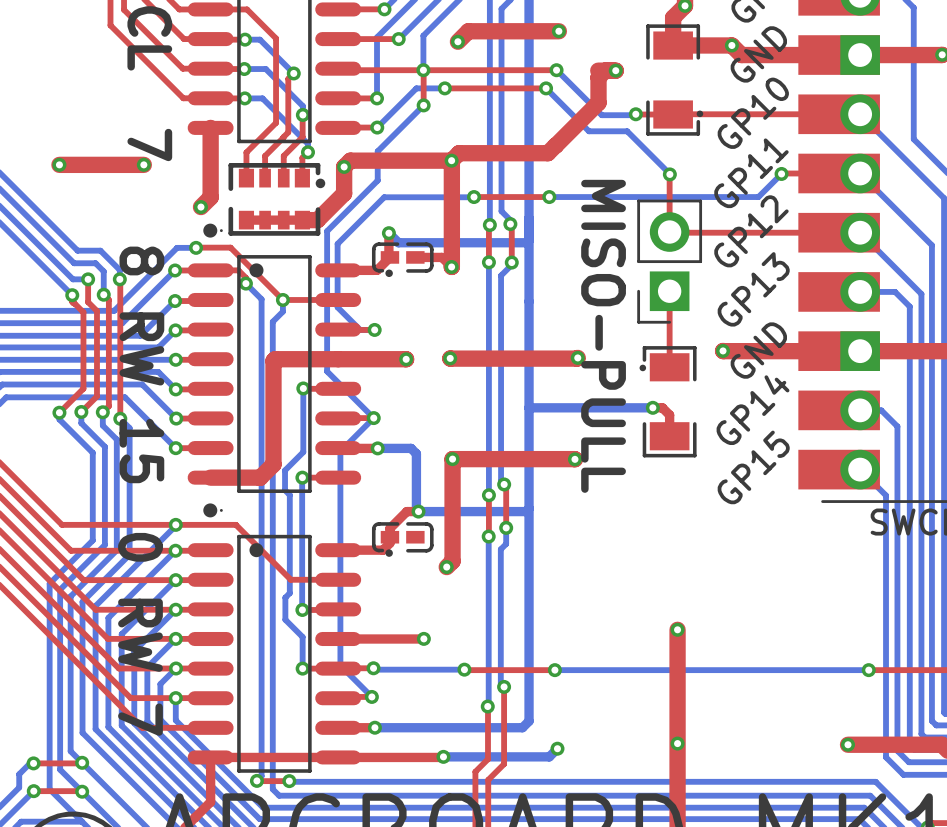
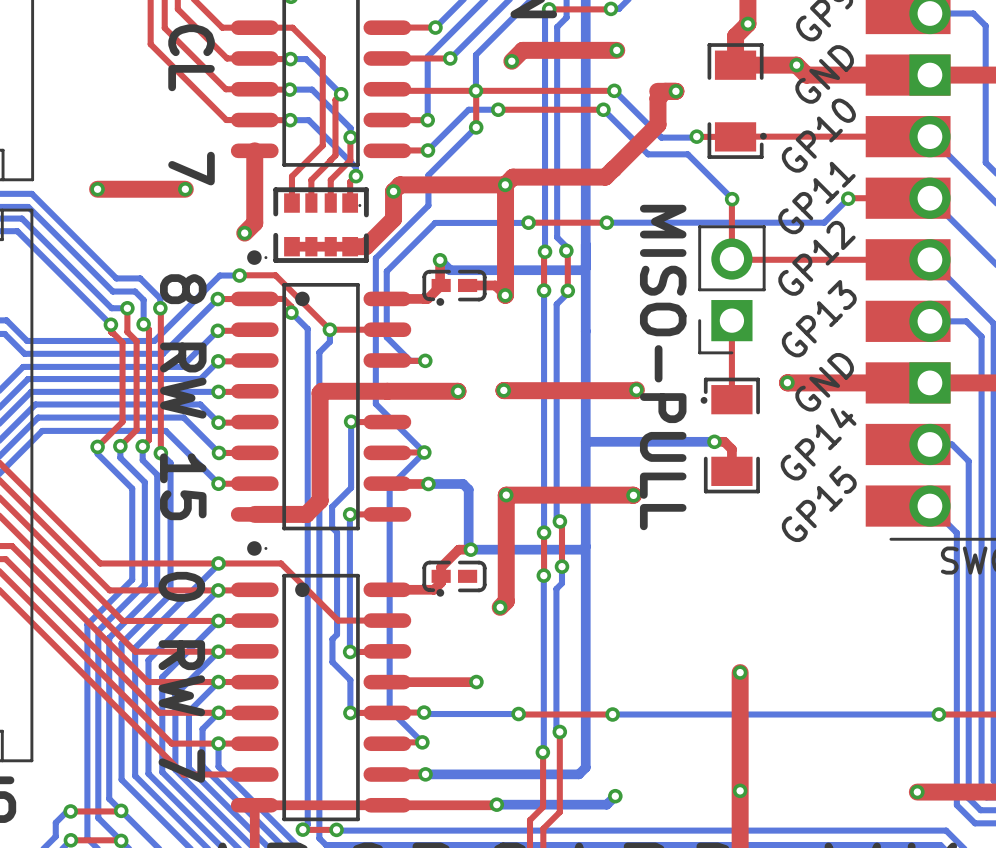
part footprint: [228, 163, 326, 236] -> [273, 187, 369, 263]

